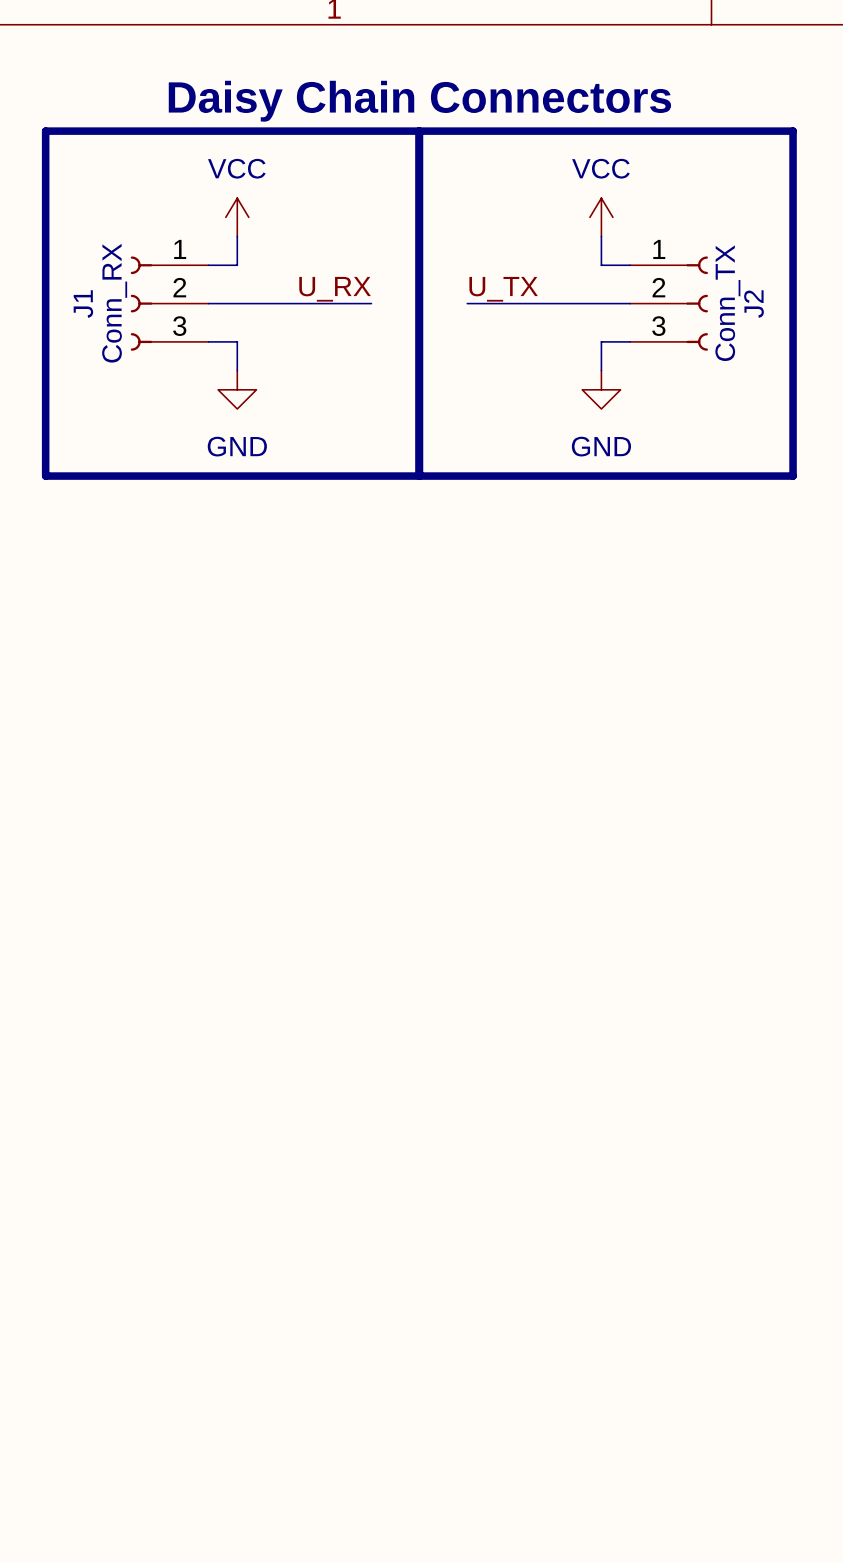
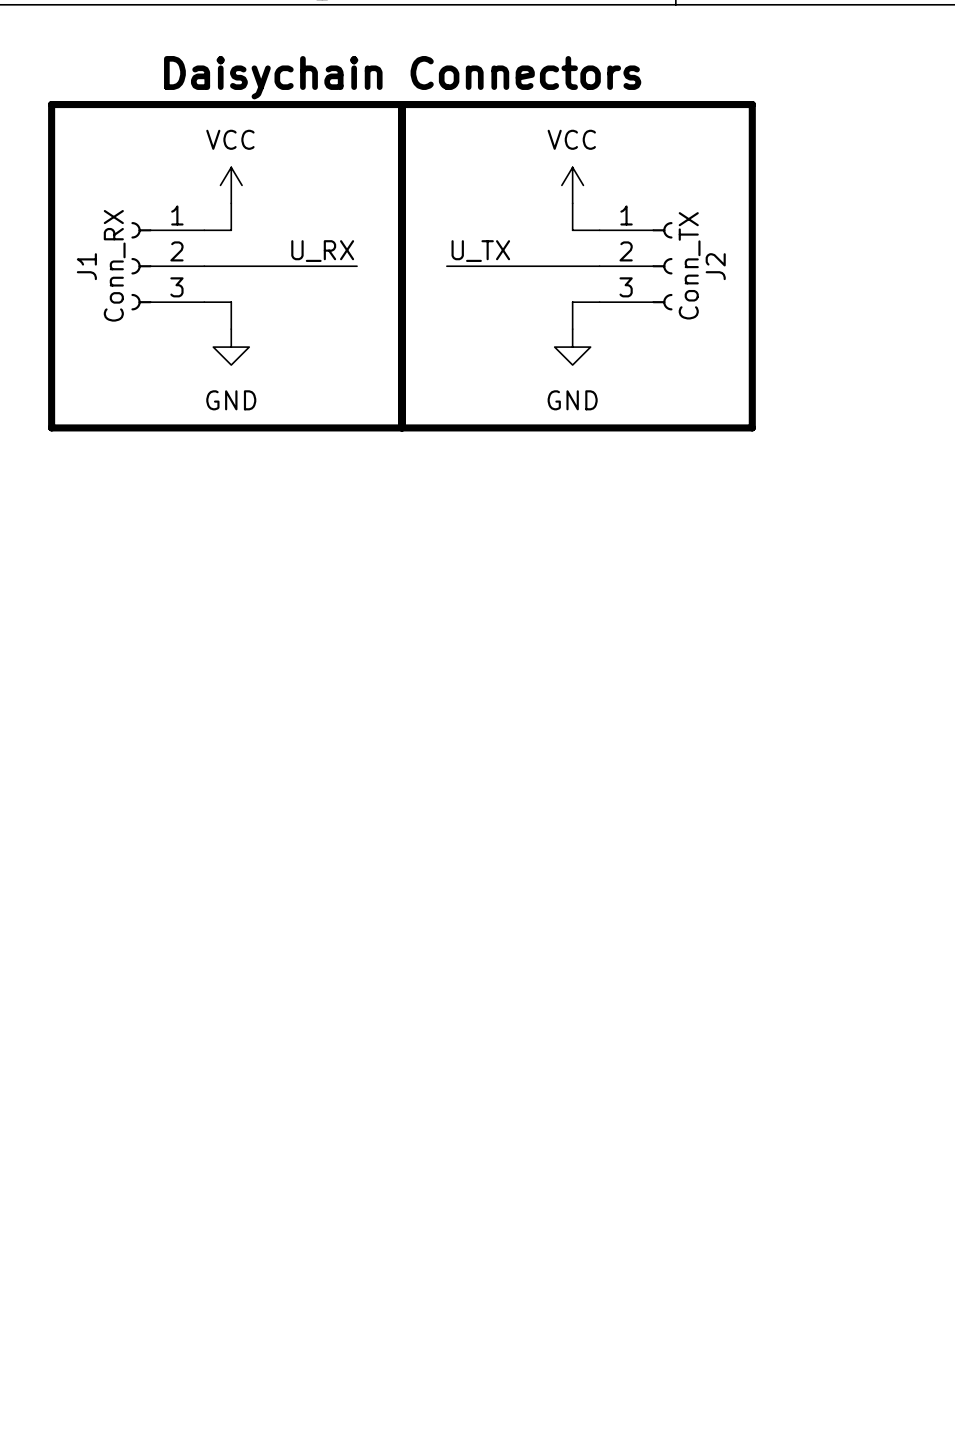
text: Daisy Chain Connectors (419, 101) -> Daisychain Connectors (402, 77)

